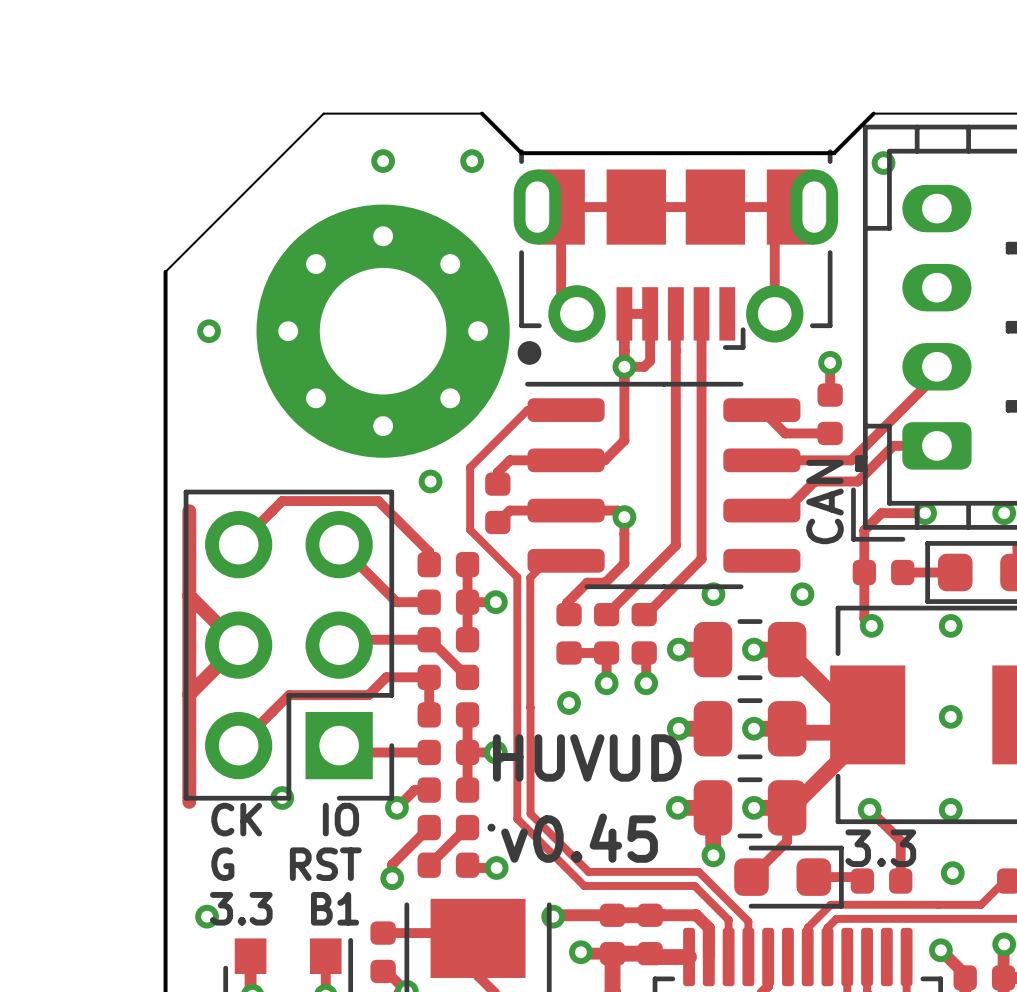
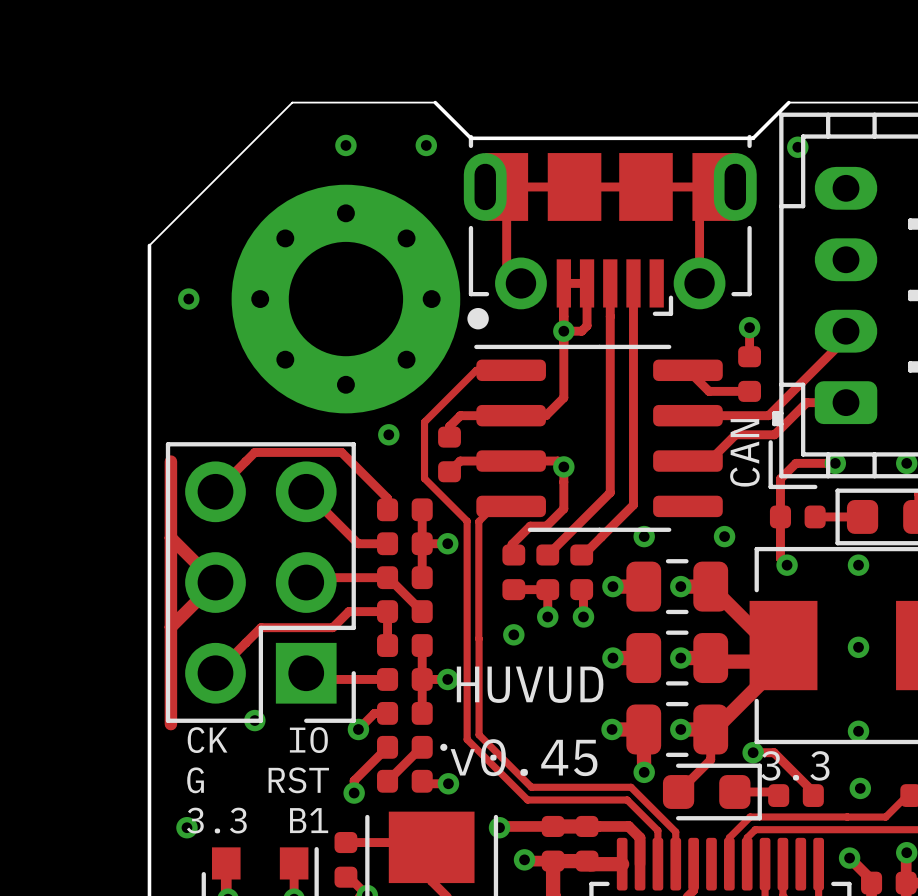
track: (869, 809) (900, 840) (900, 877) -> (753, 752) (774, 752) (813, 791)
via position: (869, 809) -> (753, 752)

